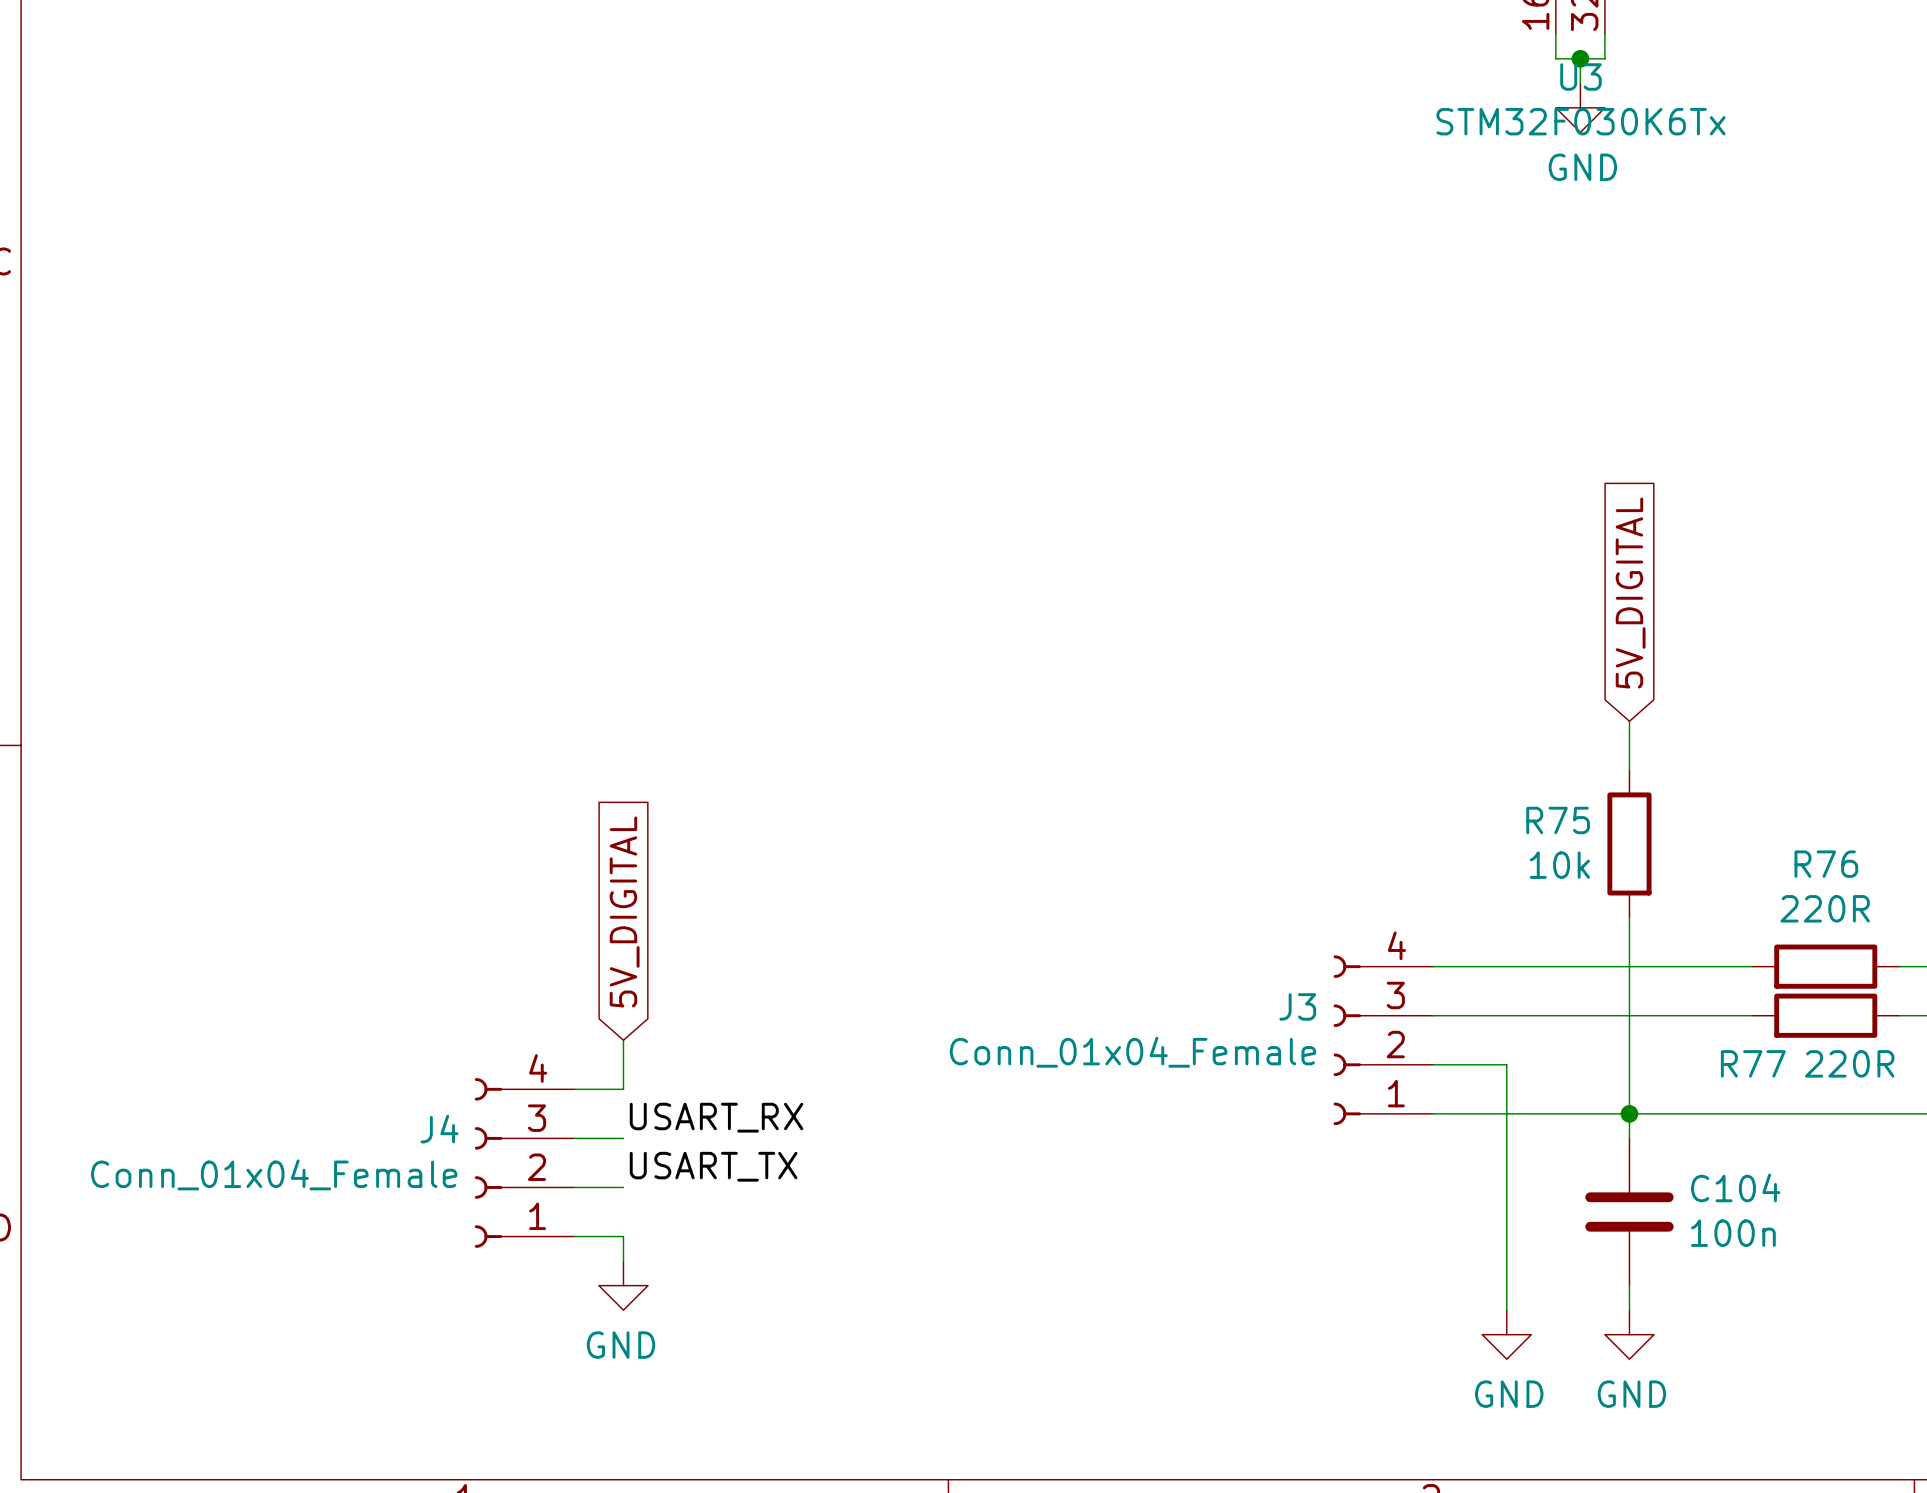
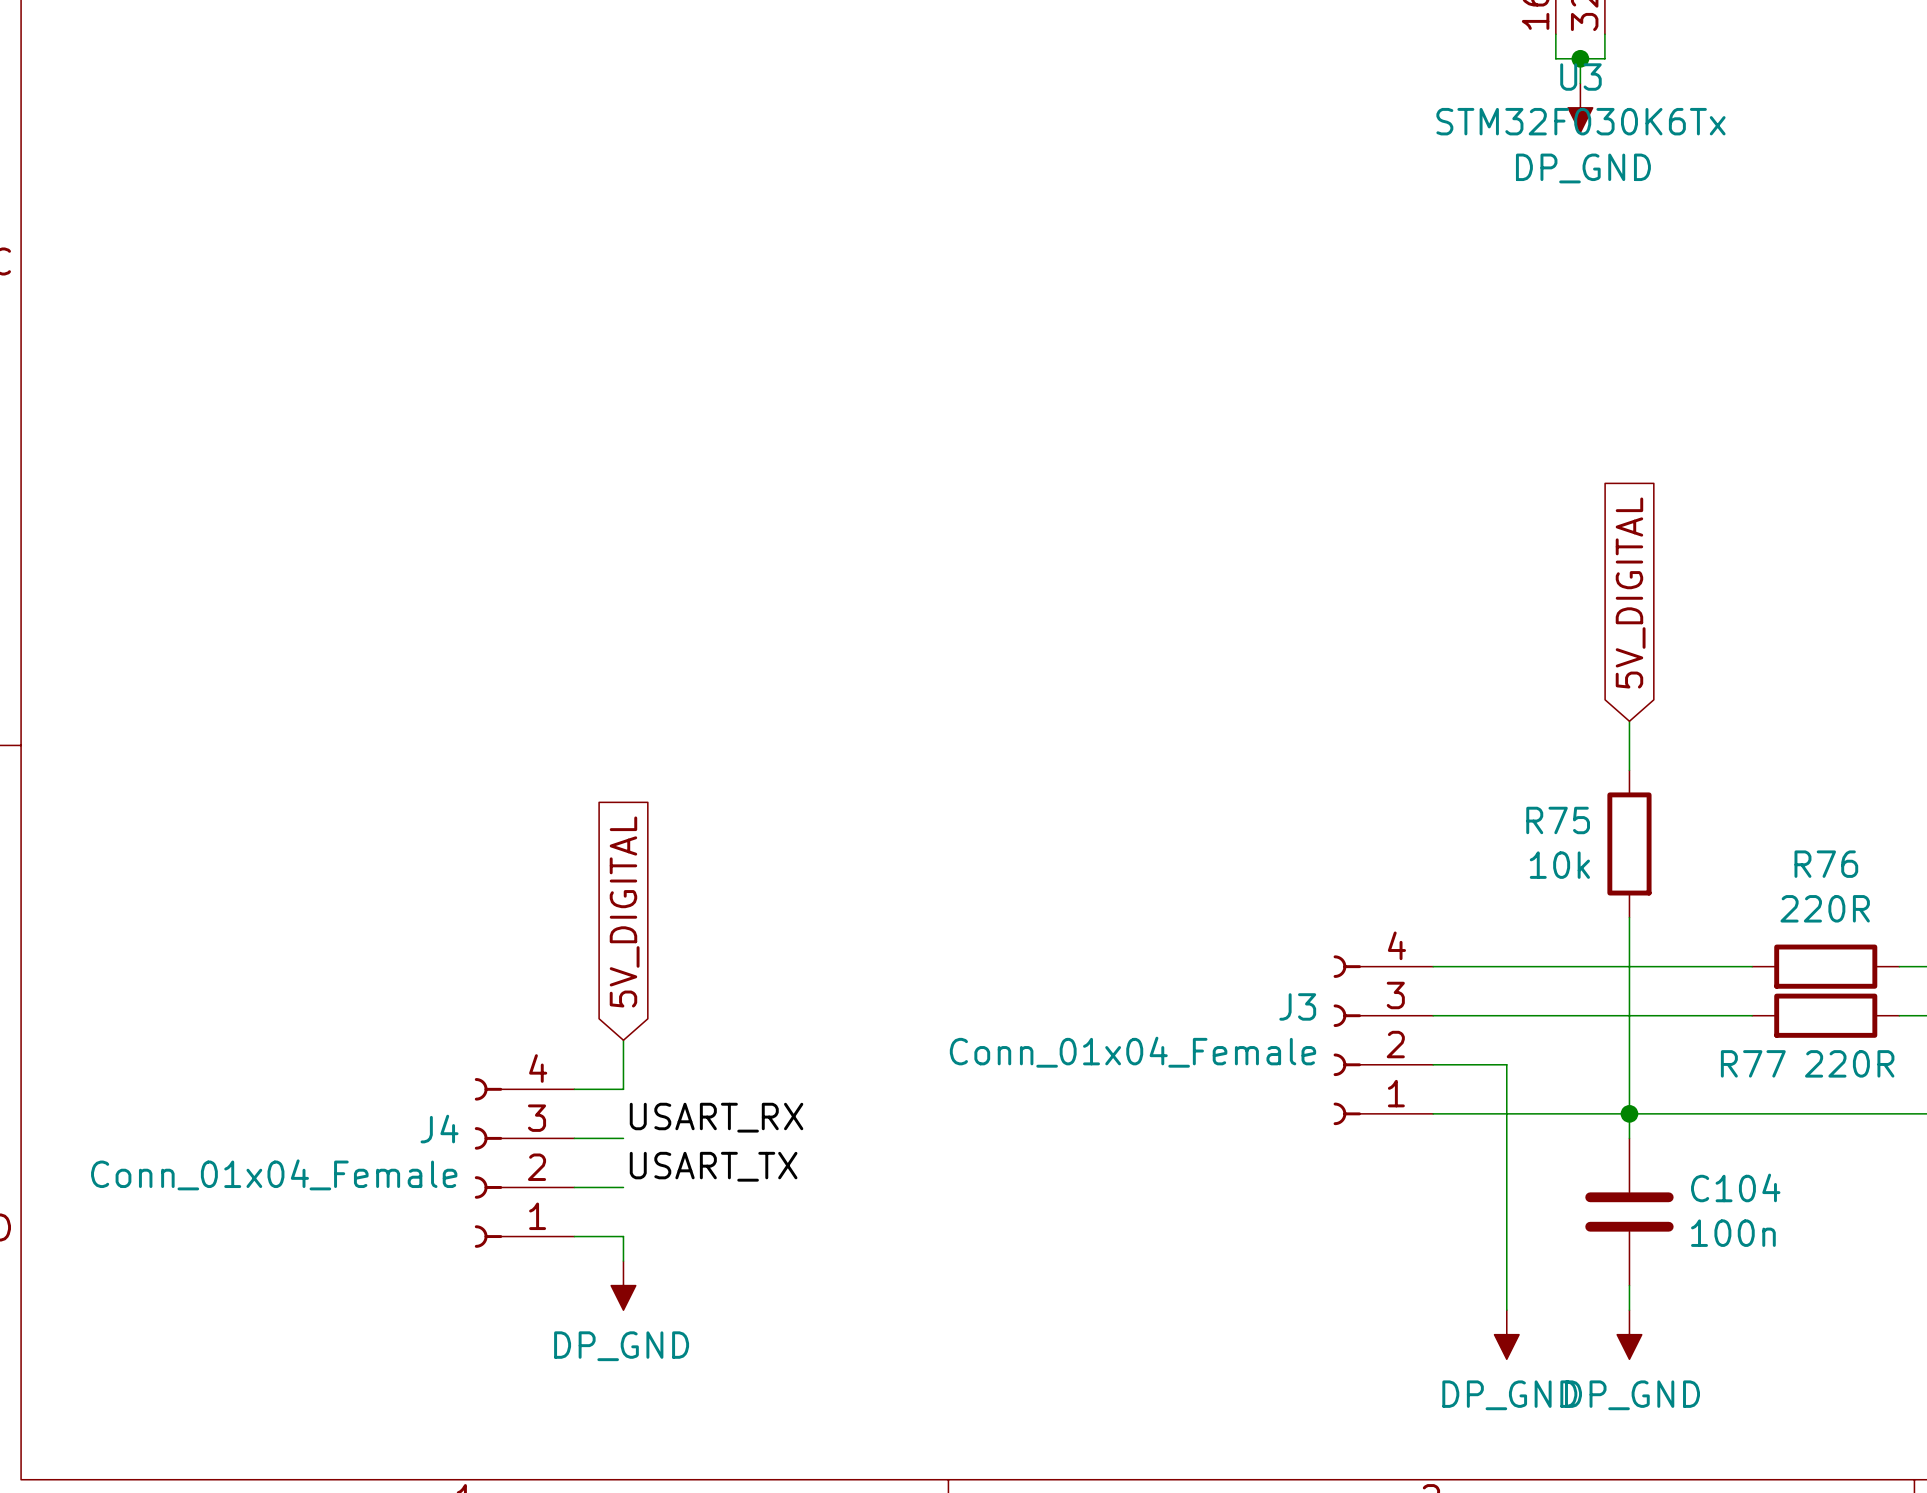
power symbol: GND (1580, 107) -> DP_GND (1580, 107)
power symbol: GND (623, 1285) -> DP_GND (623, 1285)
power symbol: GND (1506, 1334) -> DP_GND (1506, 1334)
power symbol: GND (1629, 1334) -> DP_GND (1629, 1334)

